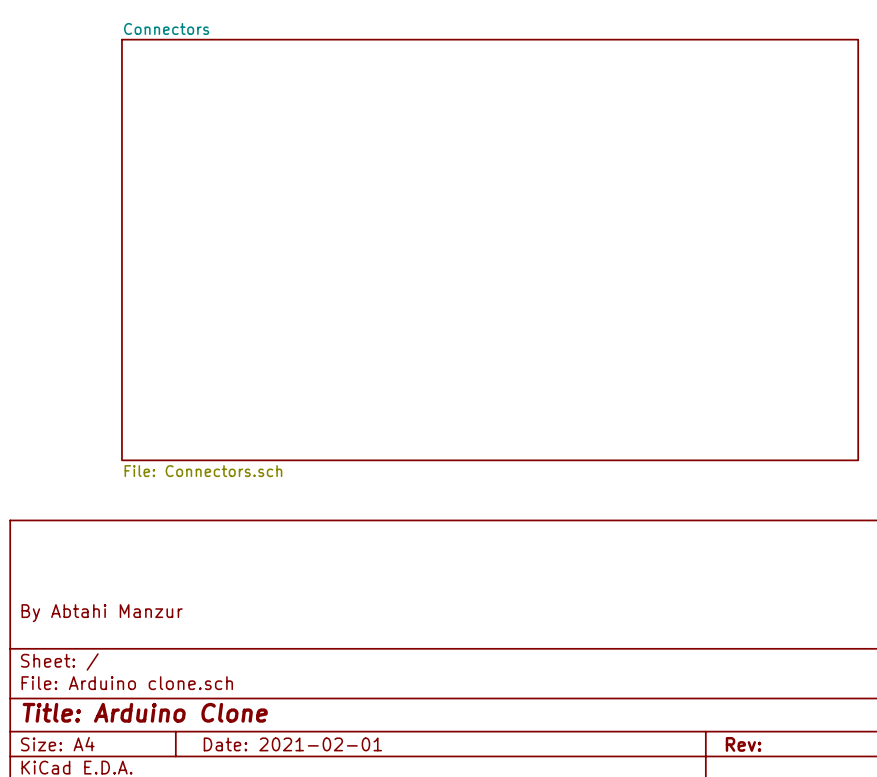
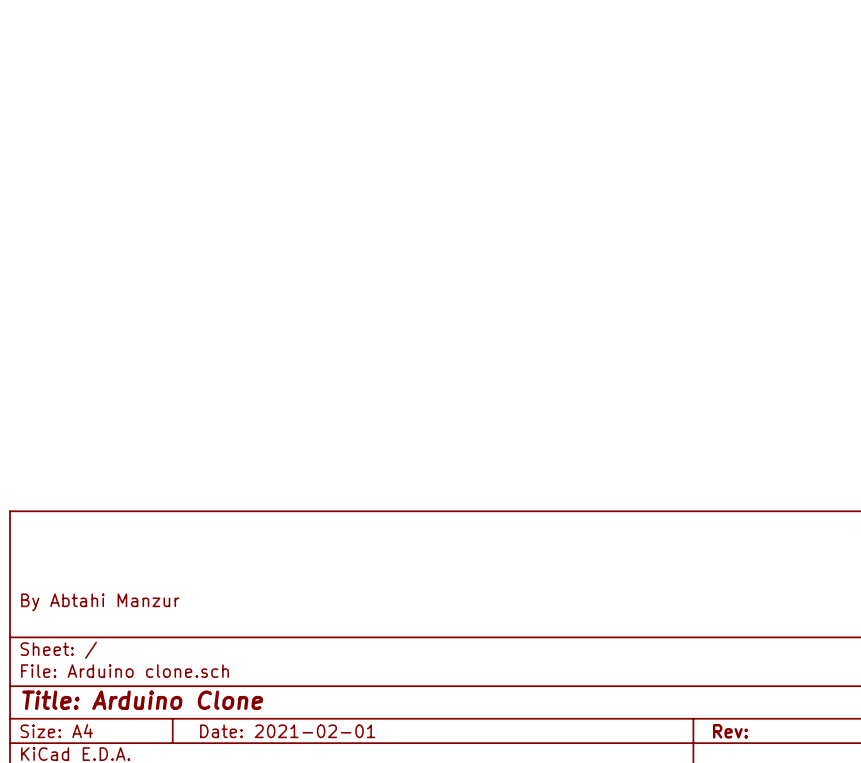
sheet Connectors: File: Connectors.sch (490, 250) -> none

